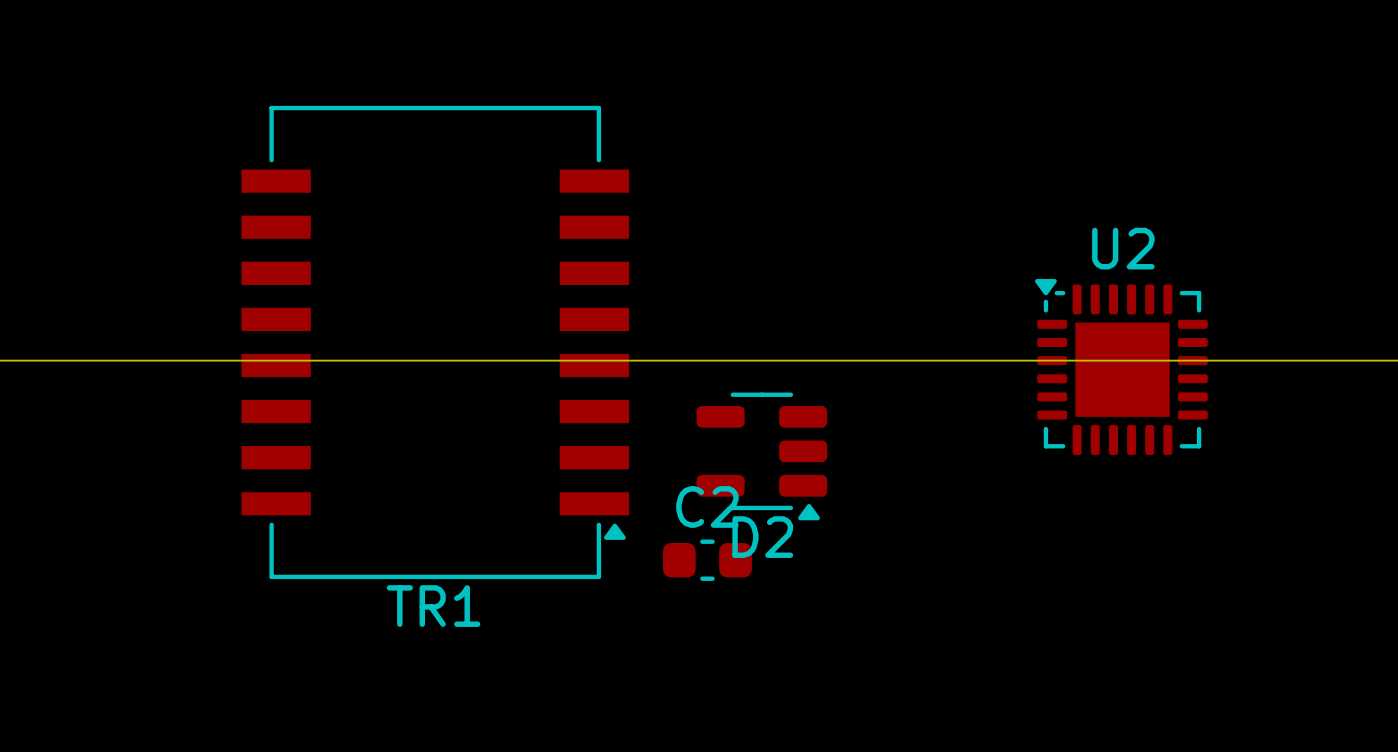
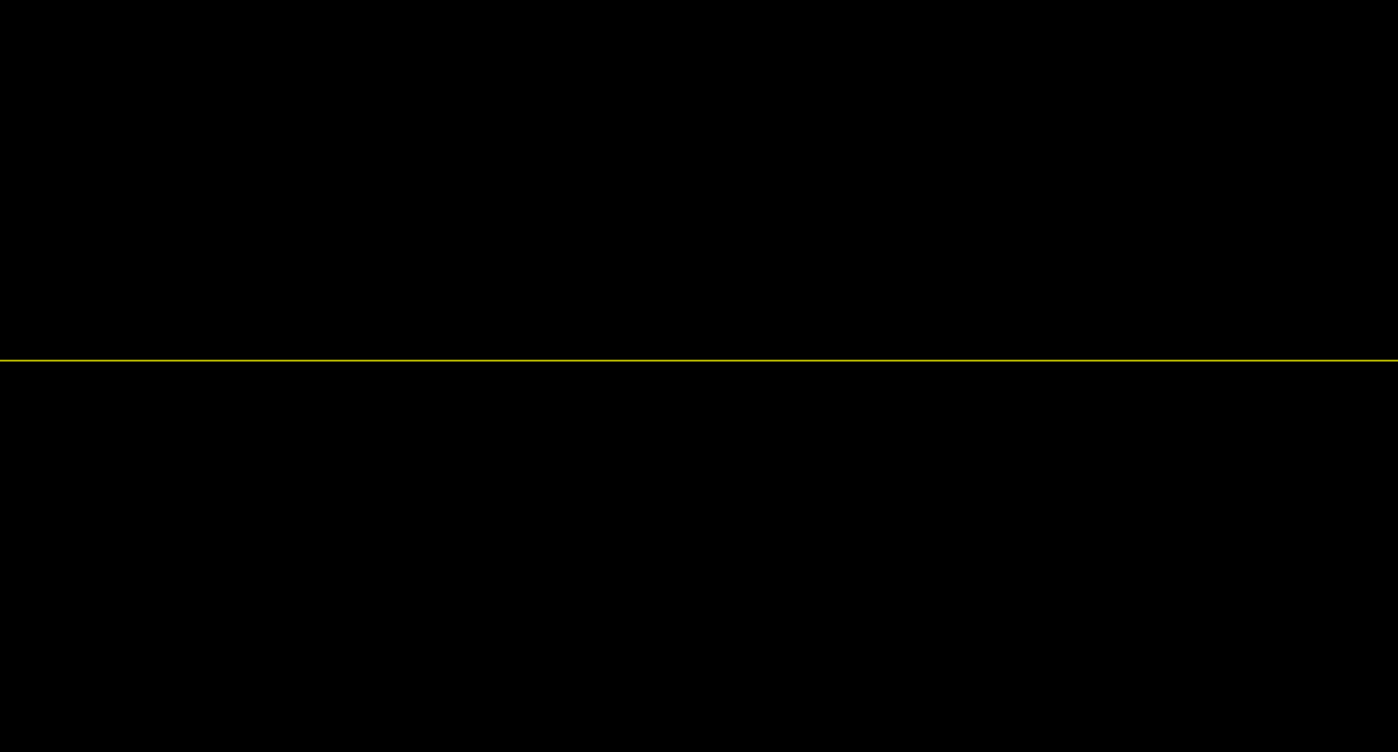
TR1: (435, 342) -> none
U2: (1121, 366) -> none
D2: (761, 456) -> none
C2: (707, 560) -> none

